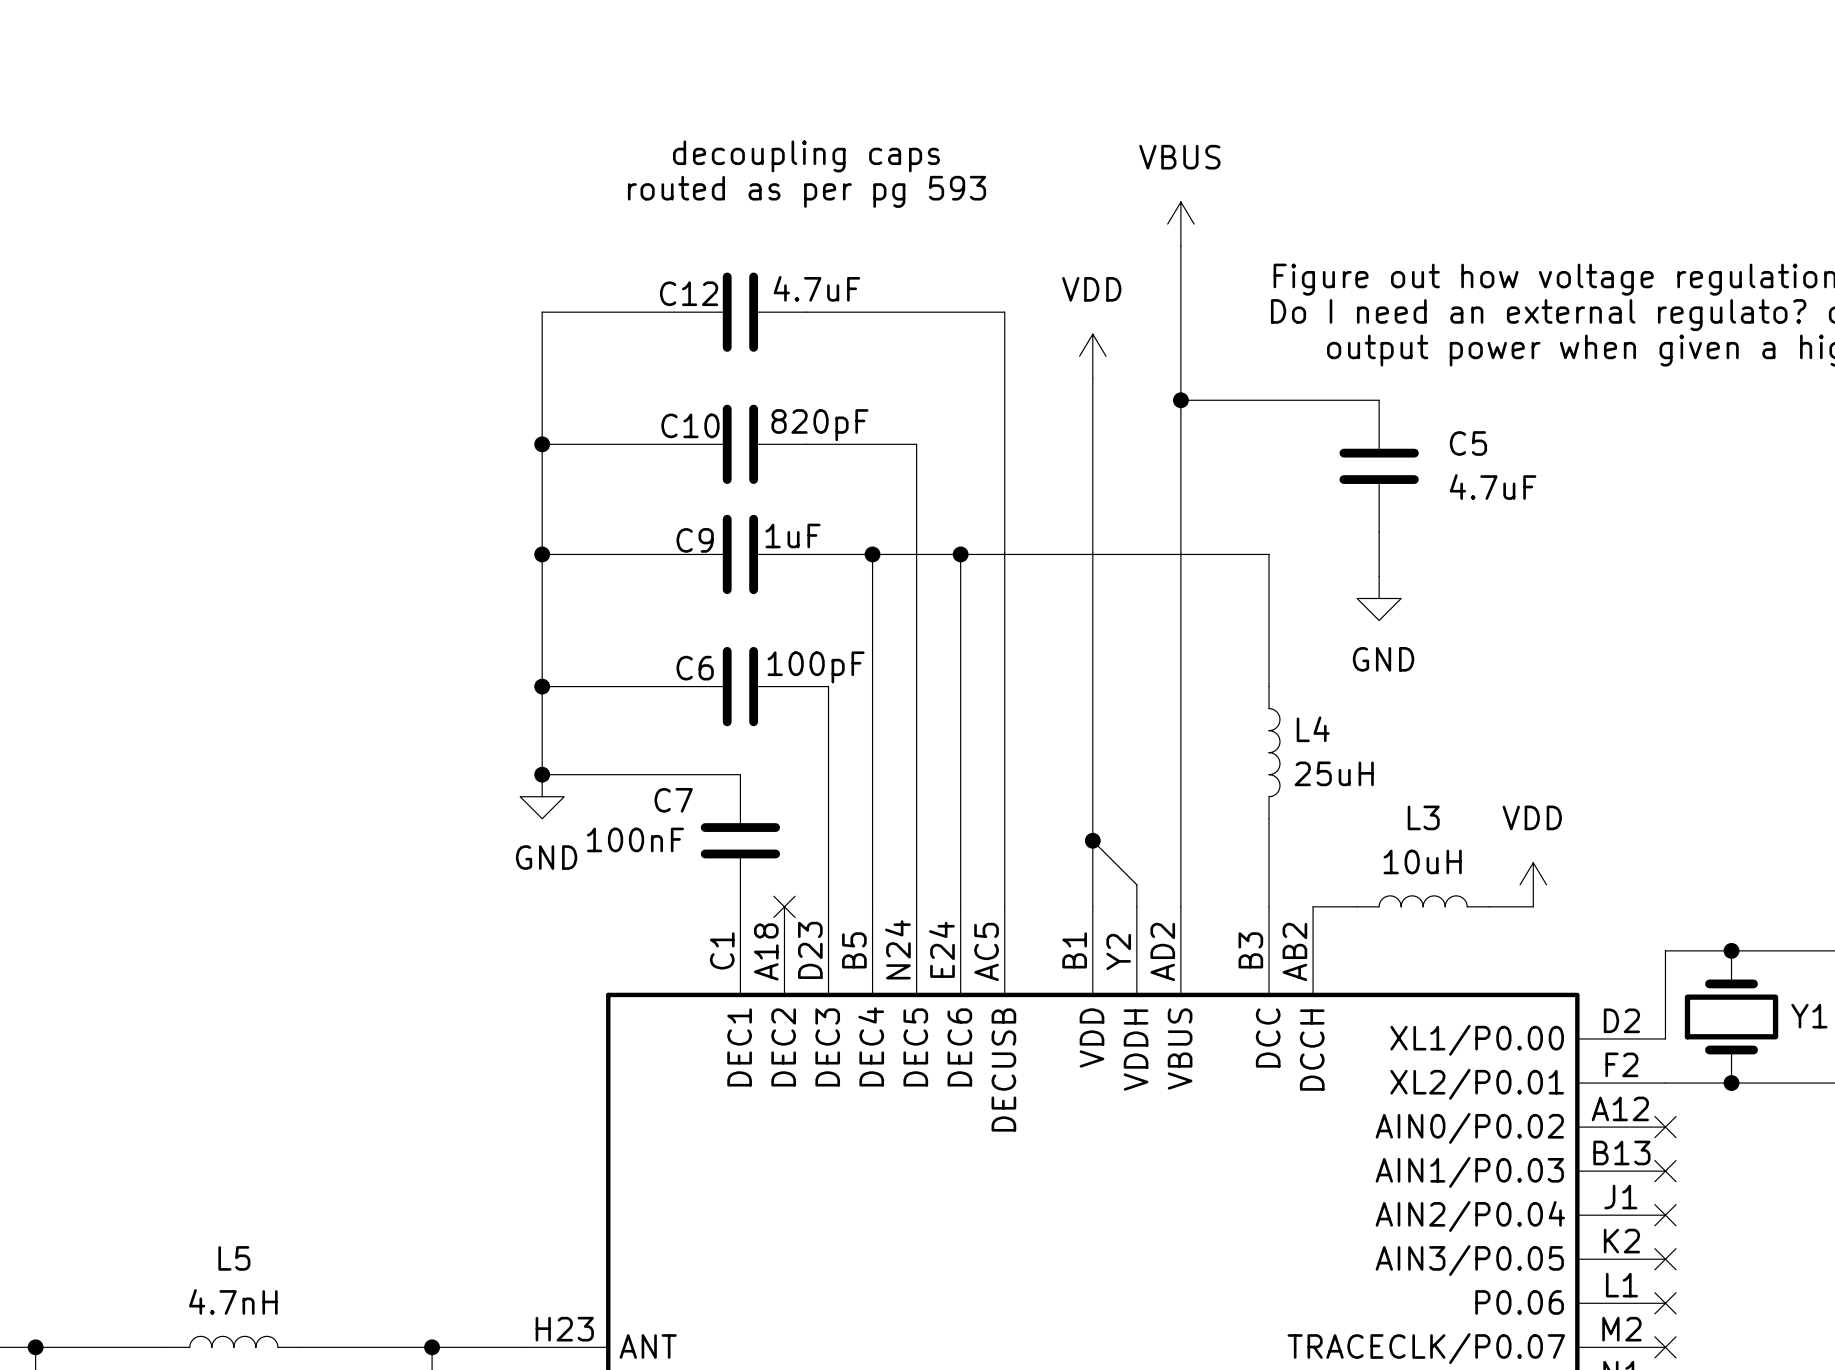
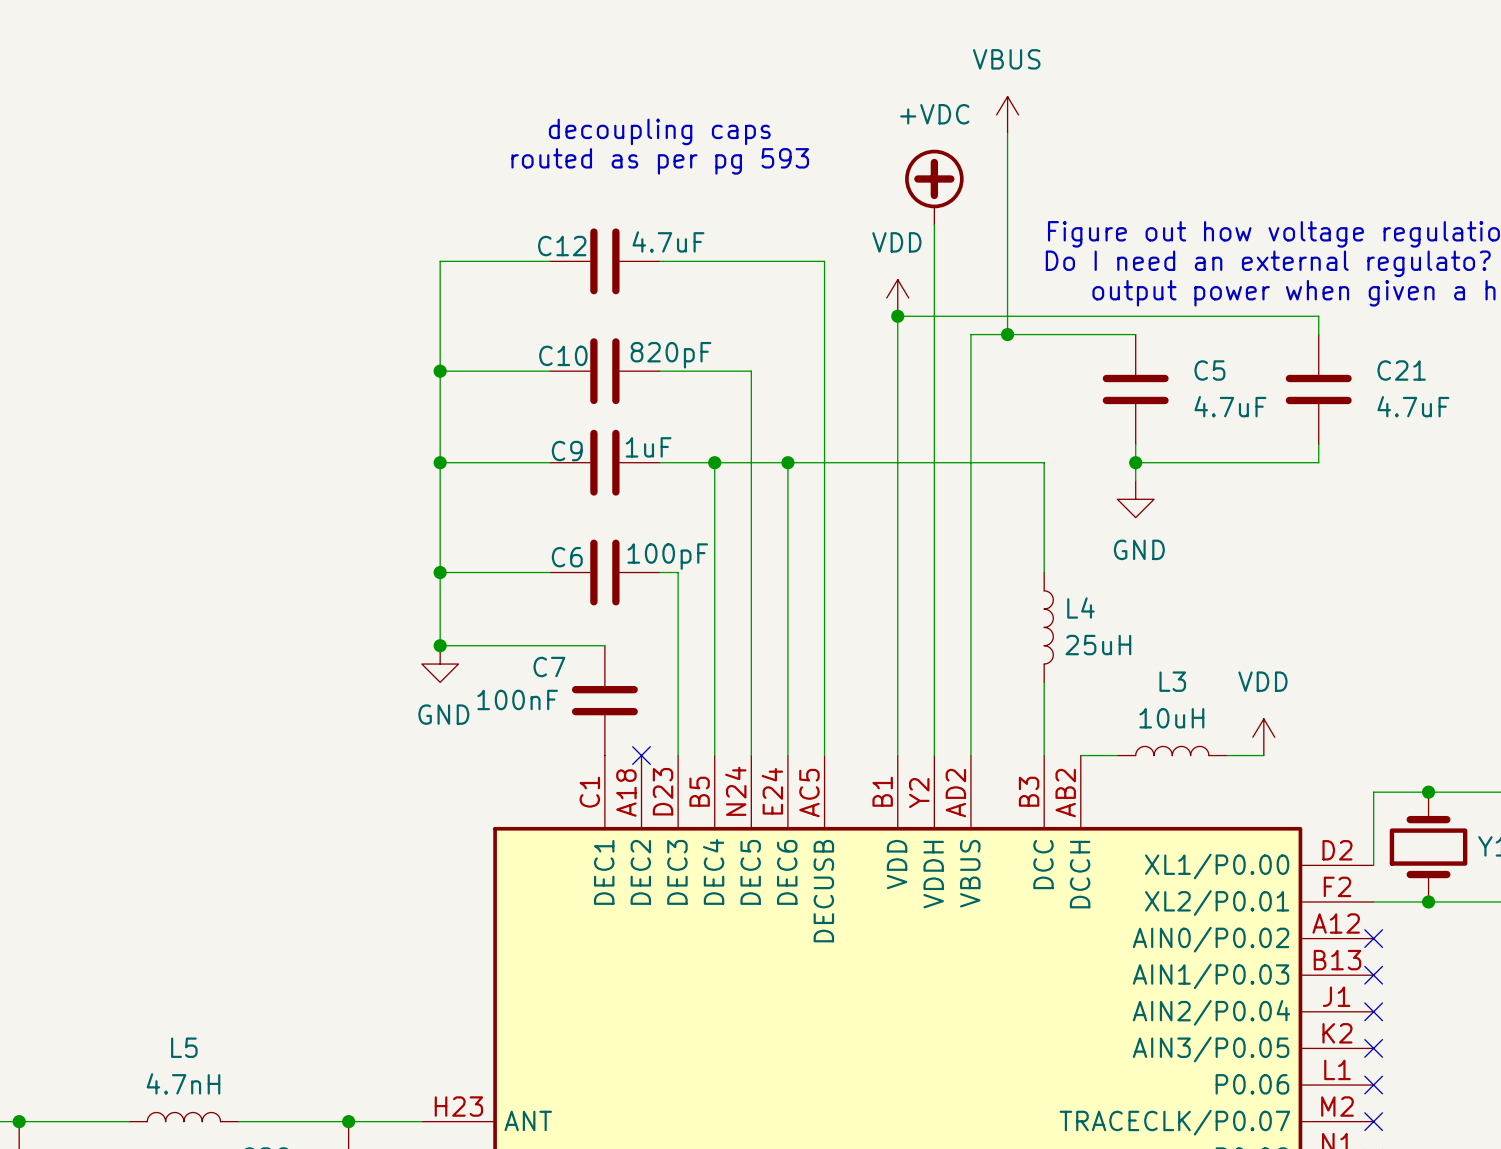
wire: none -> (1007, 133) (1007, 334)
power symbol: none -> +VDC (934, 187)
power symbol position: VBUS (1180, 224) -> VBUS (1007, 114)
wire: (1180, 246) (1180, 400) -> none
wire: none -> (897, 316) (1318, 316) (1318, 334)
junction: none -> (897, 316)
junction position: (1180, 400) -> (1007, 334)
C21: none -> 4.7uF (1318, 389)
wire: none -> (1318, 444) (1318, 462) (1135, 462)
junction: none -> (1135, 462)
wire: (1092, 840) (1136, 884) -> (934, 224) (934, 737)
junction: (1092, 840) -> none

